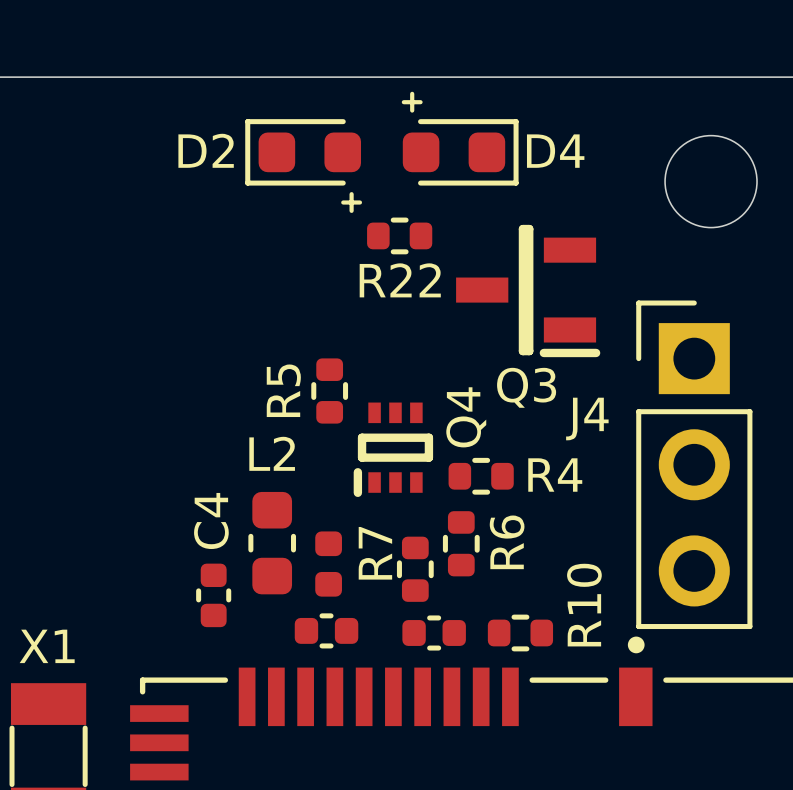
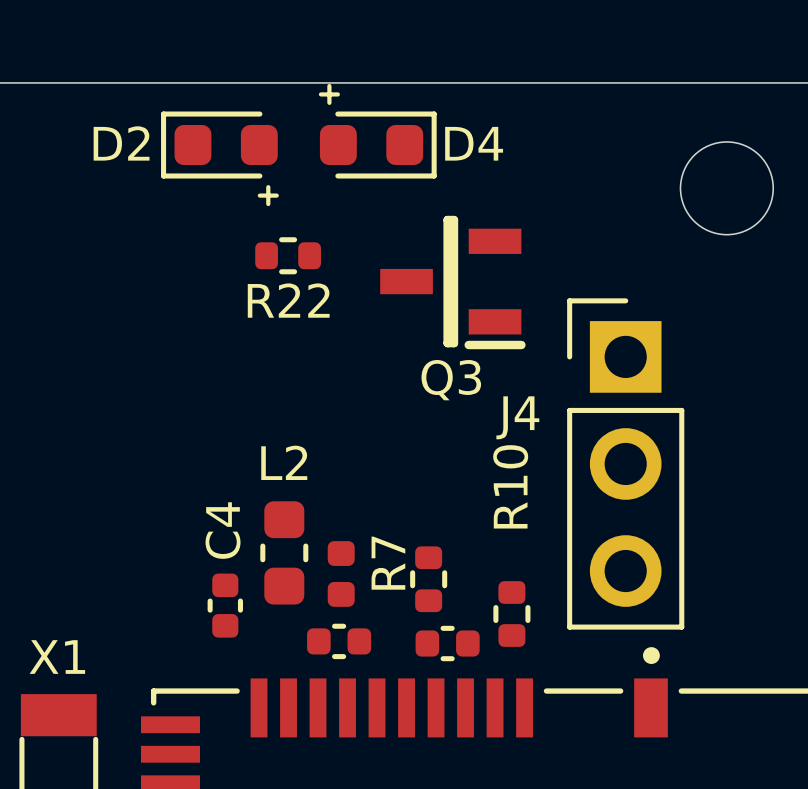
D4 footprint: [401, 91, 519, 186] -> [318, 83, 437, 179]
D2 position: (303, 166) -> (219, 158)
R22 position: (399, 235) -> (288, 255)
Q3 position: (528, 291) -> (452, 282)
R5: (329, 391) -> none
Q4: (393, 449) -> none
J4 position: (694, 464) -> (625, 463)
R4: (481, 476) -> none
R6: (461, 543) -> none
R10 name position: R10 (584, 605) -> R10 (510, 486)
R10 rotation: 0° (520, 632) -> 90° clockwise (511, 614)

